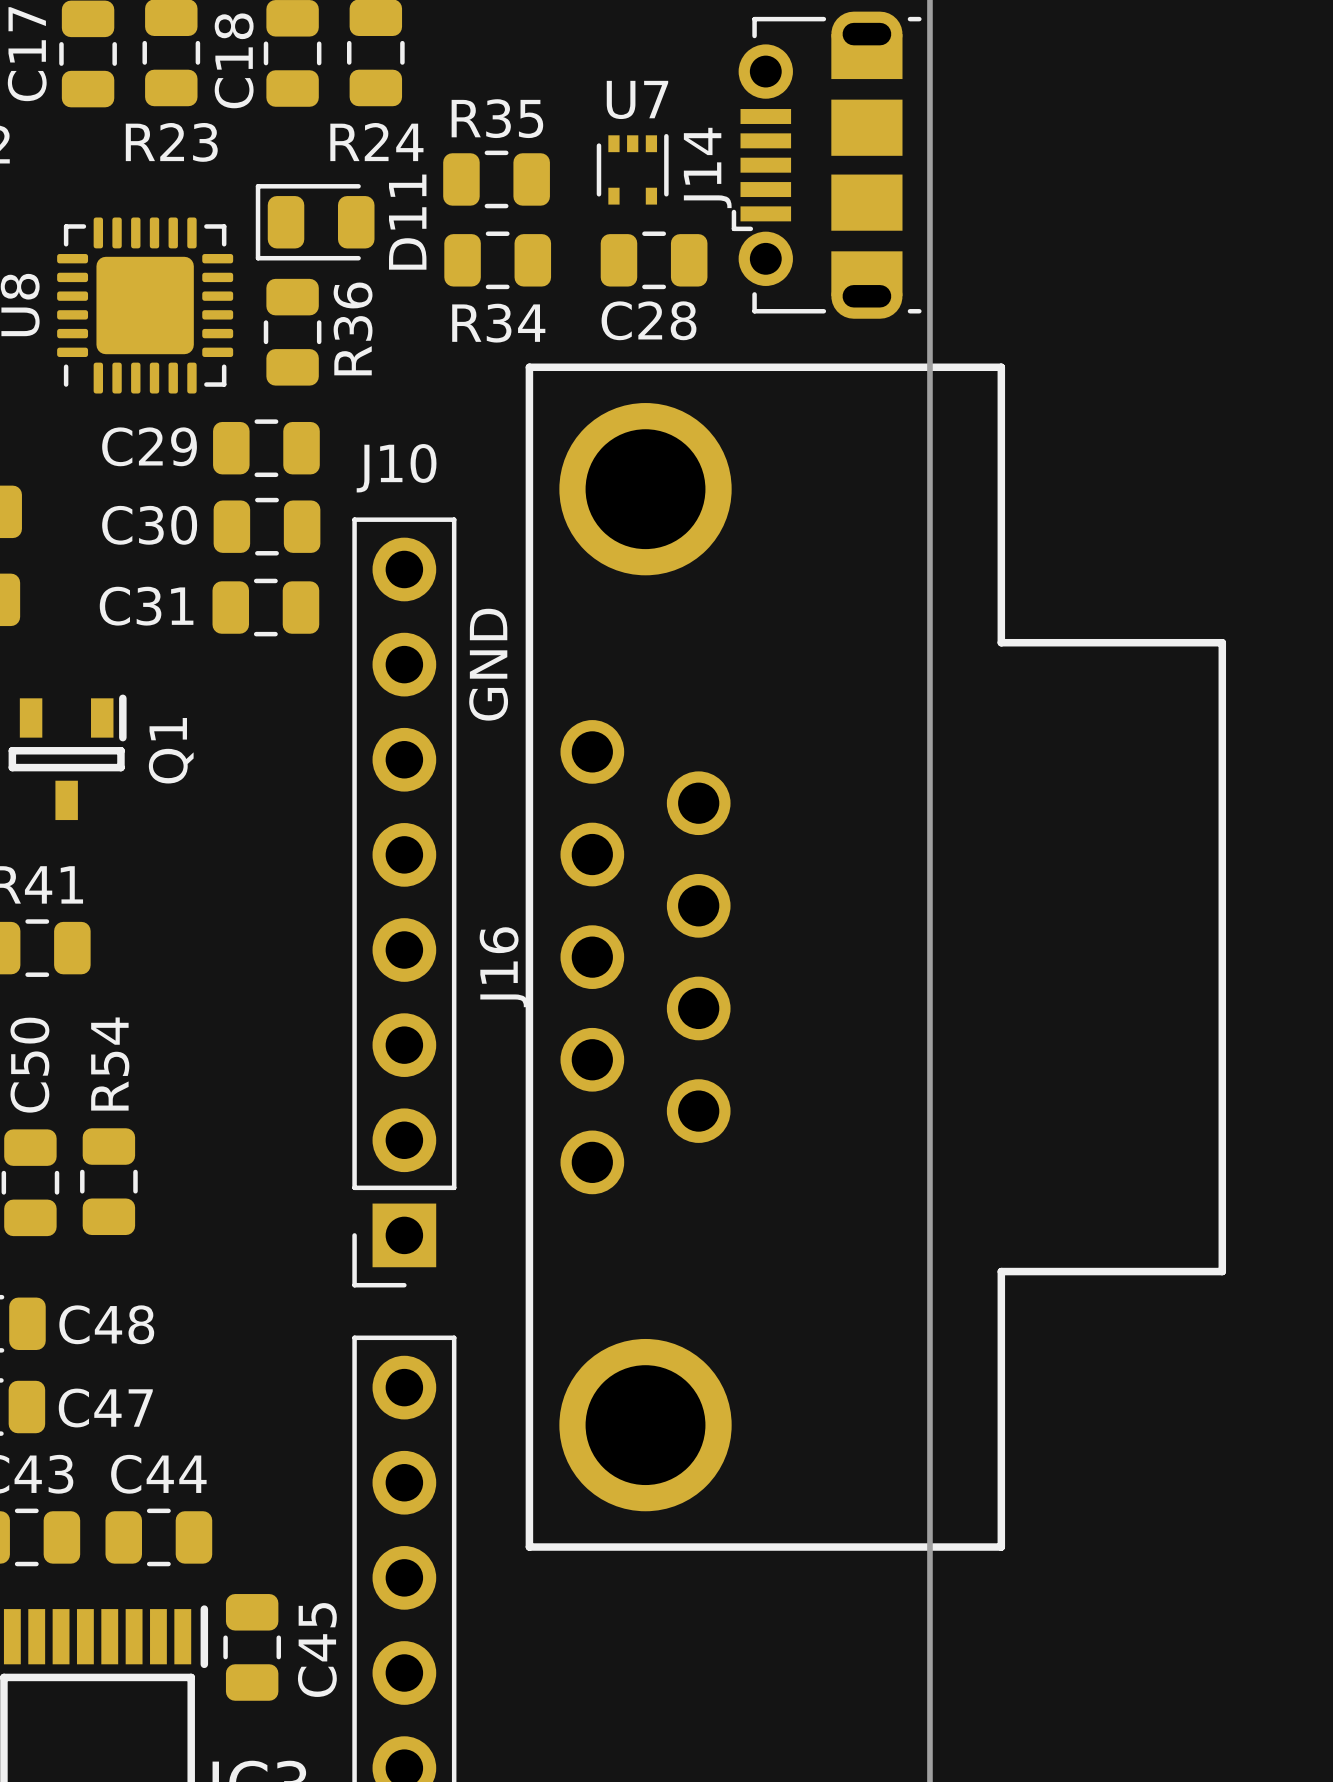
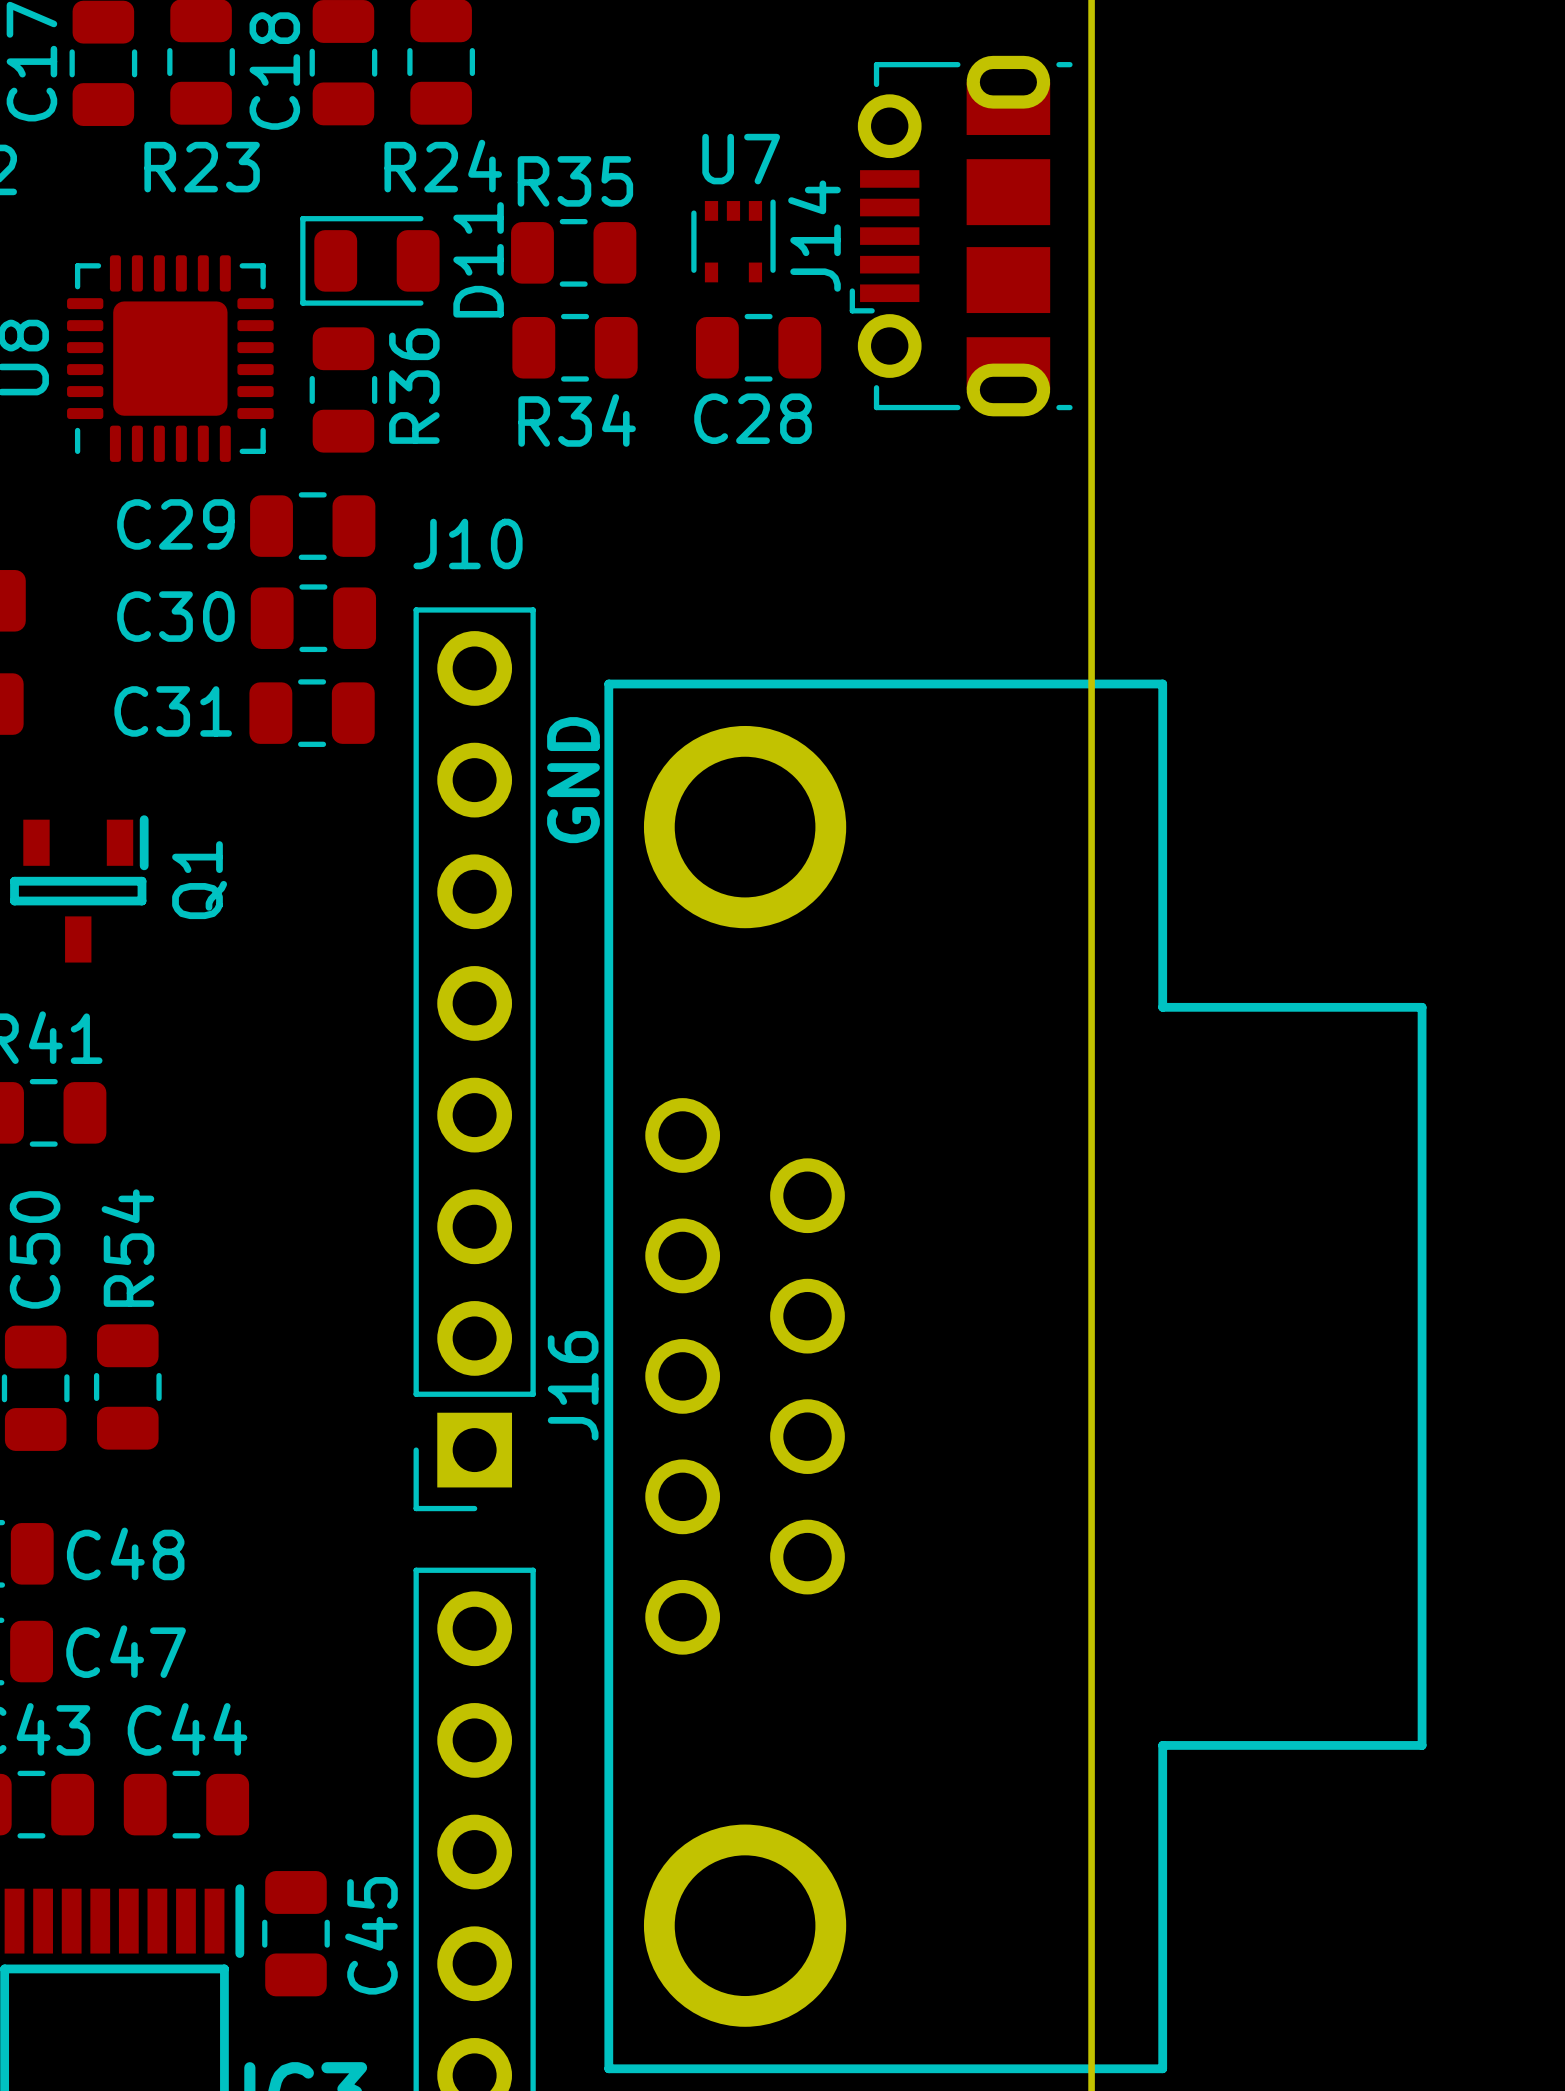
J14 position: (826, 165) -> (961, 236)
U7 position: (632, 169) -> (733, 240)
R35 position: (496, 179) -> (573, 252)
R34 position: (497, 260) -> (575, 347)
C28 position: (654, 260) -> (758, 347)
J16 position: (875, 957) -> (1015, 1376)

